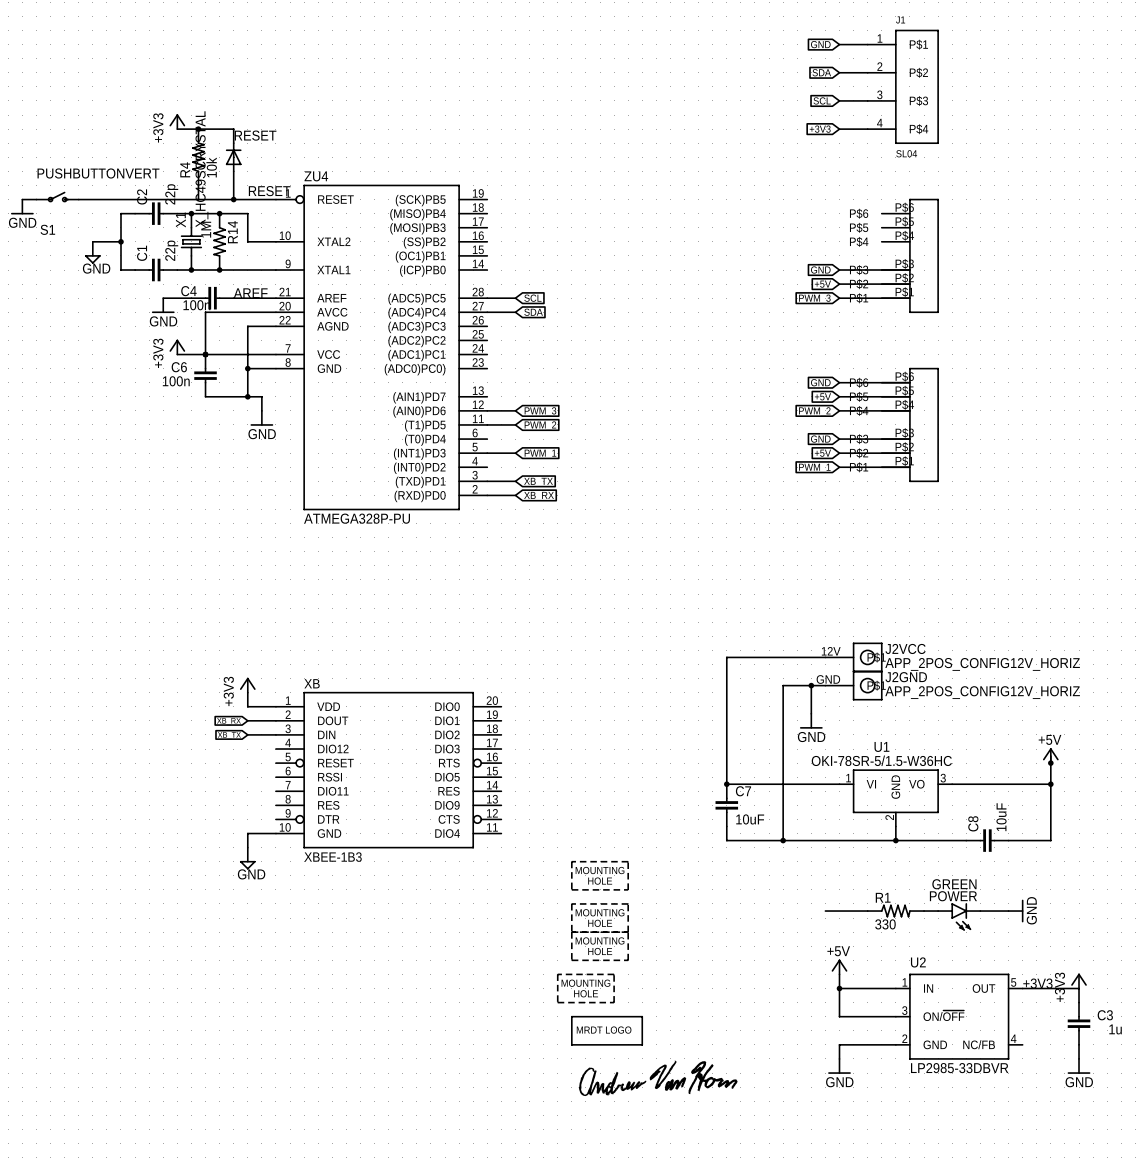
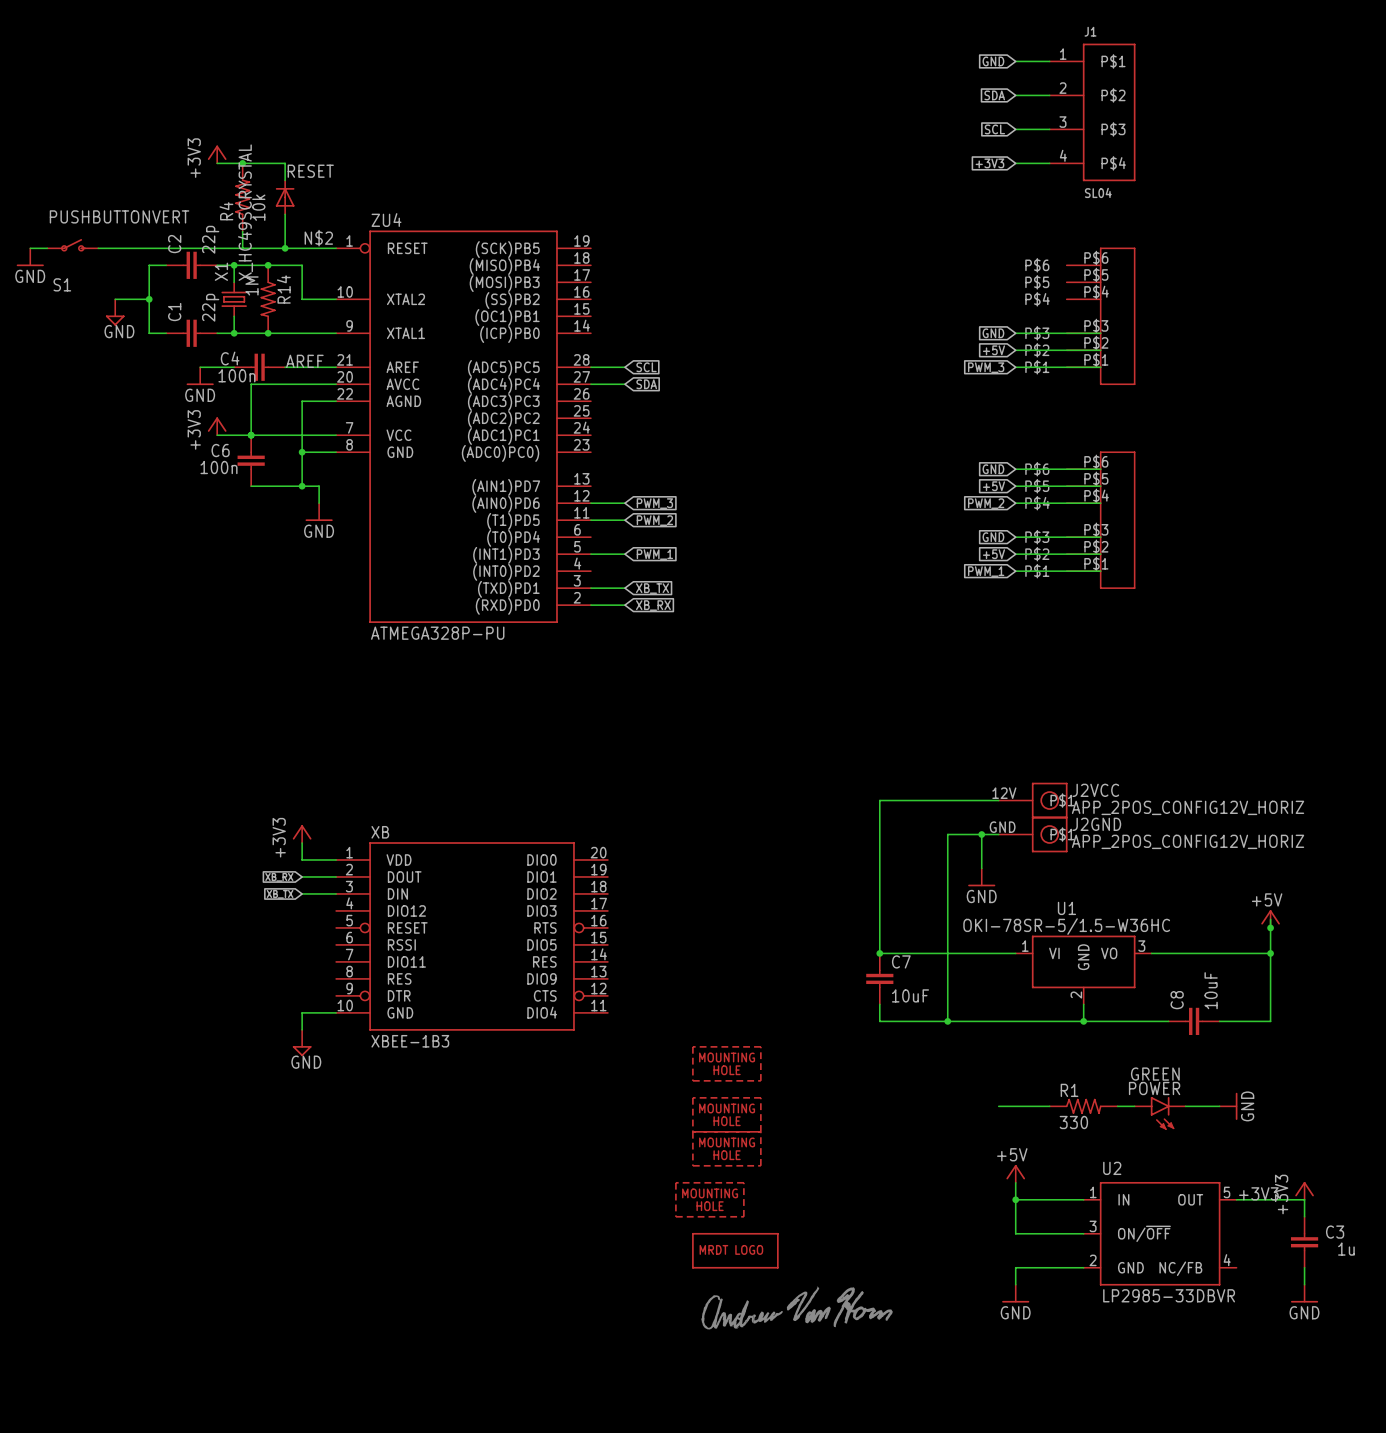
label: RESET (269, 191) -> N$2 (318, 238)

